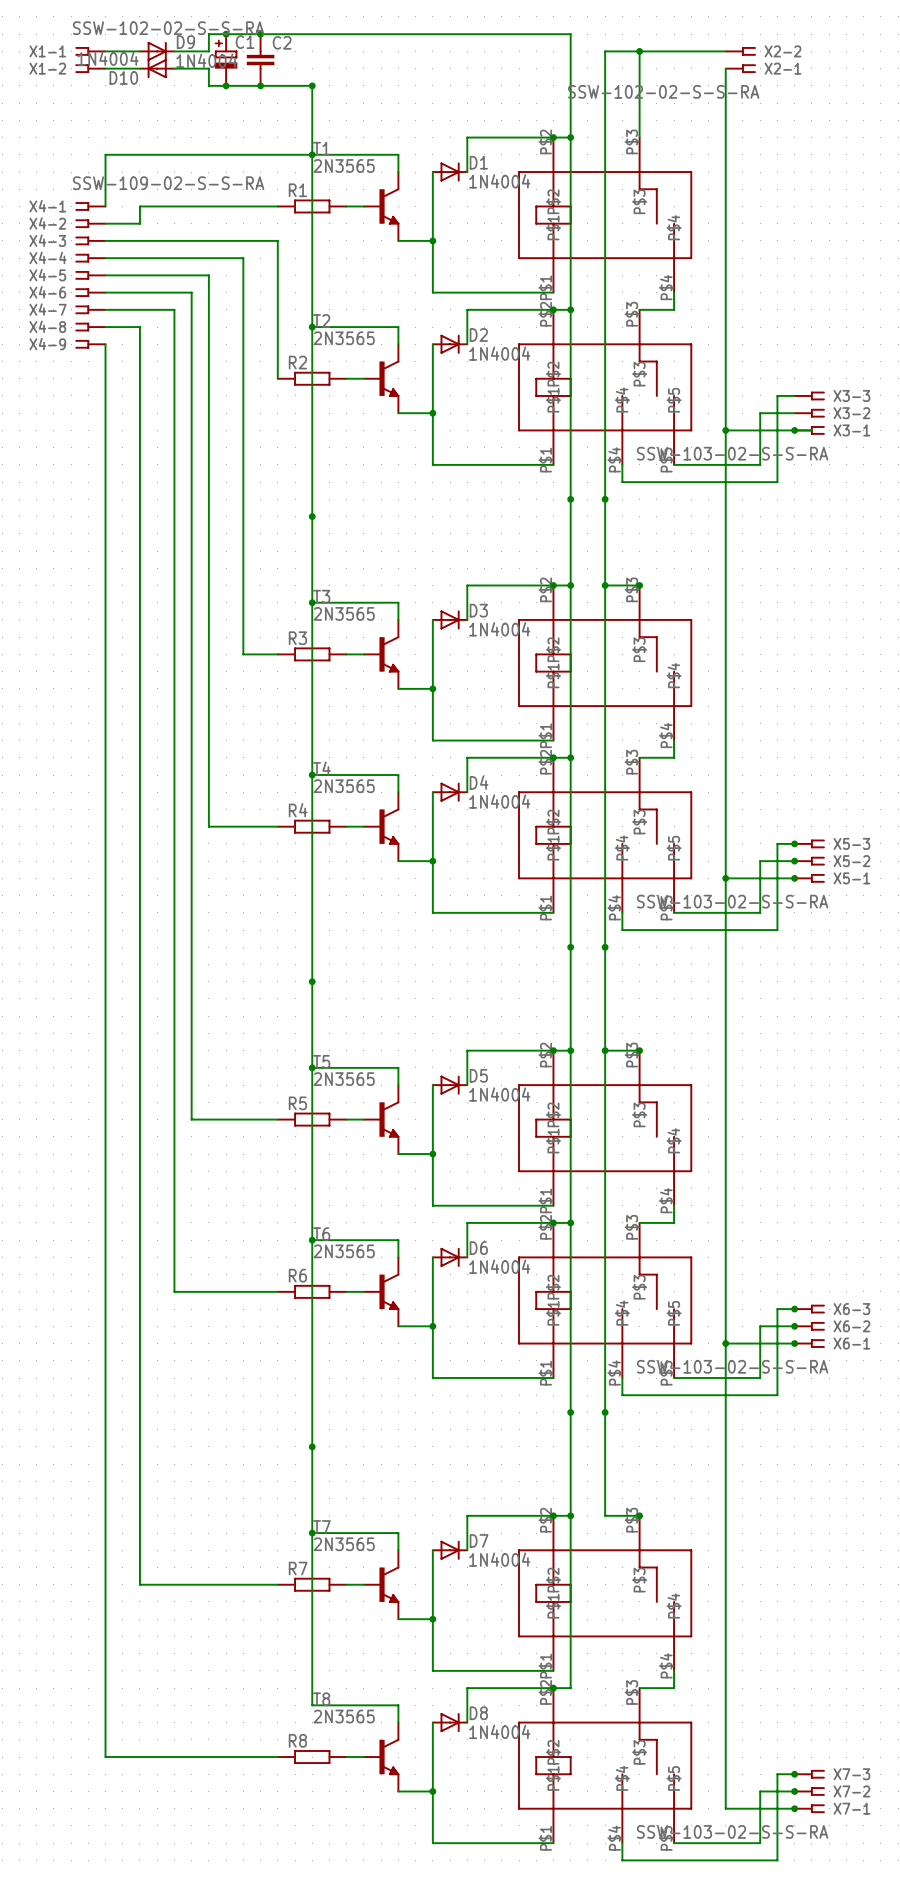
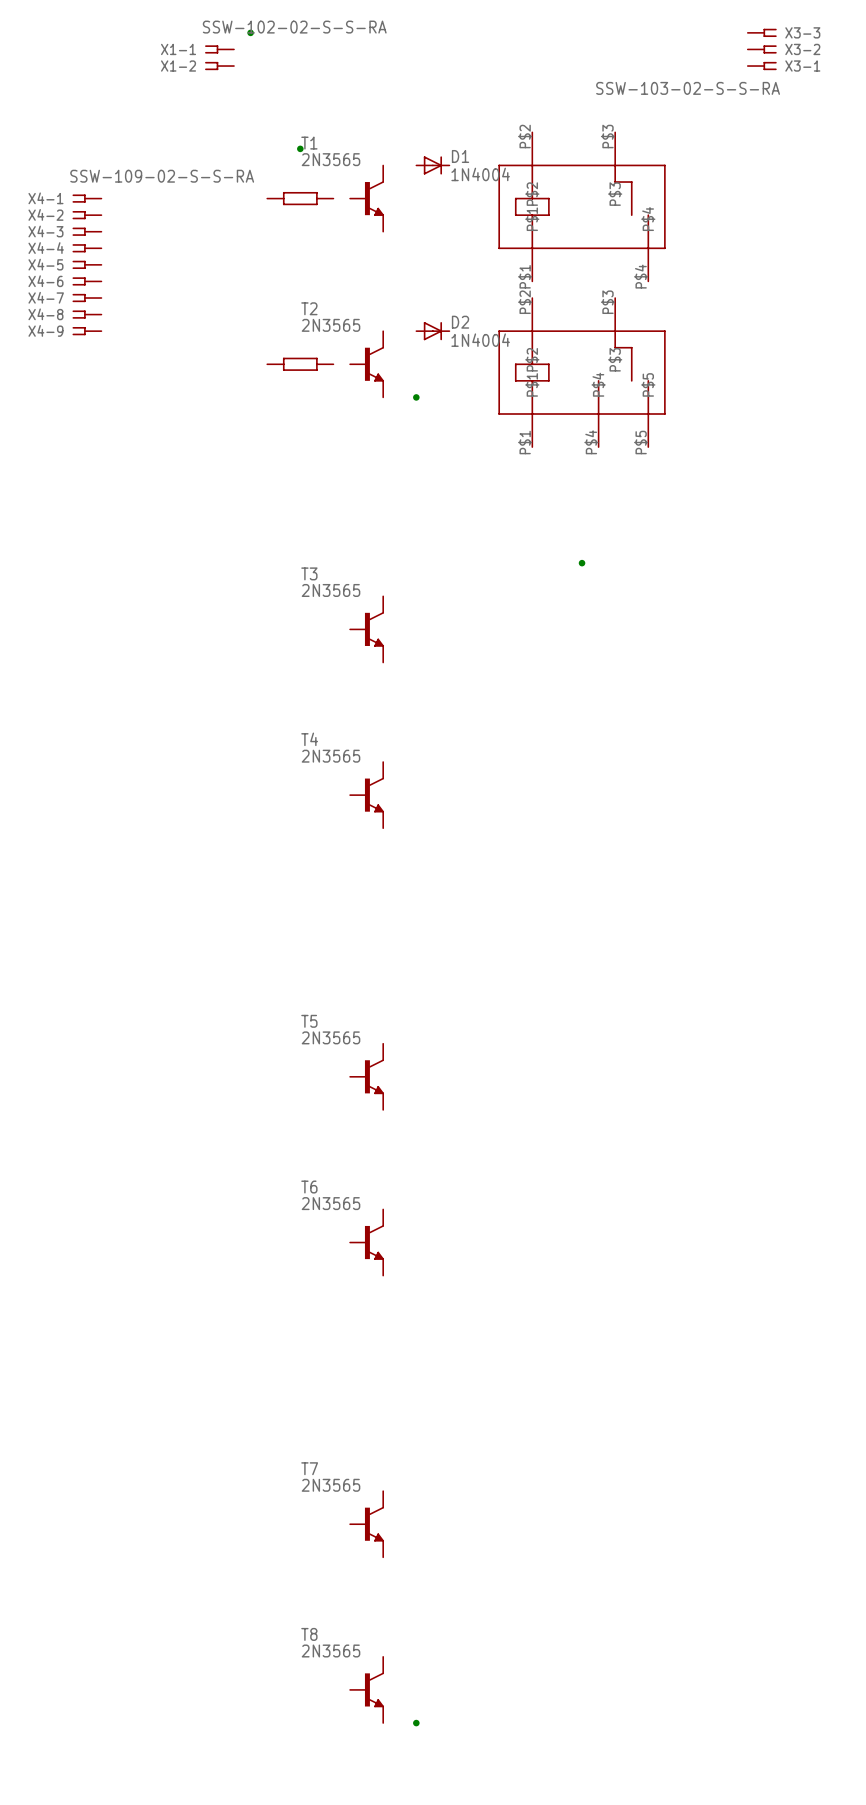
junction: (226, 34) -> none
X1-1 position: (90, 51) -> (219, 49)
wire: (105, 51) (139, 51) -> none
D9: 1N4004 (157, 51) -> none
wire: (174, 51) (208, 51) (208, 34) (570, 34) (570, 1688) (467, 1688) (467, 1722) -> none
wire: (639, 51) (639, 137) -> none
junction: (639, 51) -> none
wire: (725, 51) (605, 51) (605, 1515) (639, 1515) -> none
X2-2: (740, 51) -> none
C1: (226, 60) -> none
C2: (260, 60) -> none
X1-2 position: (90, 68) -> (219, 66)
wire: (105, 68) (139, 68) -> none
D10: 1N4004 (157, 68) -> none
wire: (174, 68) (208, 68) (208, 85) (312, 85) (312, 1705) (398, 1705) (398, 1722) -> none
wire: (725, 68) (725, 1808) (794, 1808) -> none
X2-1: SSW-102-02-S-S-RA (740, 68) -> none
junction: (226, 85) -> none
junction: (260, 85) -> none
junction: (312, 85) -> none
junction: (553, 137) -> none
wire: (570, 137) (467, 137) (467, 172) -> none
junction: (570, 137) -> none
wire: (398, 172) (398, 154) (105, 154) (105, 206) -> none
wire: (432, 172) (432, 292) (553, 292) -> none
wire: (277, 206) (139, 206) (139, 223) (105, 223) -> none
R1: (312, 206) -> none
part: none -> (300, 198)
wire: (346, 206) (363, 206) -> none
wire: (105, 240) (277, 240) (277, 378) -> none
wire: (398, 240) (432, 240) -> none
junction: (432, 240) -> none
wire: (105, 258) (243, 258) (243, 654) (277, 654) -> none
wire: (105, 275) (208, 275) (208, 826) (277, 826) -> none
wire: (105, 292) (191, 292) (191, 1119) (277, 1119) -> none
wire: (674, 292) (674, 309) (639, 309) -> none
wire: (105, 309) (174, 309) (174, 1291) (277, 1291) -> none
junction: (553, 309) -> none
wire: (570, 309) (467, 309) (467, 344) -> none
junction: (570, 309) -> none
wire: (105, 327) (139, 327) (139, 1584) (277, 1584) -> none
wire: (312, 327) (398, 327) (398, 344) -> none
junction: (312, 327) -> none
wire: (105, 344) (105, 1757) (277, 1757) -> none
wire: (432, 344) (432, 464) (553, 464) -> none
R2: (312, 378) -> none
part: none -> (300, 364)
wire: (346, 378) (363, 378) -> none
wire: (794, 395) (777, 395) (777, 482) (622, 482) (622, 464) -> none
X3-3 position: (809, 395) -> (762, 32)
wire: (398, 413) (432, 413) -> none
wire: (794, 413) (760, 413) (760, 464) (674, 464) -> none
X3-2 position: (809, 413) -> (762, 49)
wire: (725, 430) (811, 430) -> none
junction: (725, 430) -> none
junction: (794, 430) -> none
X3-1 position: (809, 430) -> (762, 66)
junction: (570, 499) -> none
junction: (605, 499) -> none
junction: (312, 516) -> none
junction: (553, 585) -> none
wire: (570, 585) (467, 585) (467, 619) -> none
junction: (570, 585) -> none
wire: (605, 585) (639, 585) -> none
junction: (639, 585) -> none
wire: (312, 602) (398, 602) (398, 619) -> none
junction: (312, 602) -> none
wire: (432, 619) (432, 740) (553, 740) -> none
D3: 1N4004 (450, 619) -> none
R3: (312, 654) -> none
wire: (346, 654) (363, 654) -> none
part: (605, 663) -> none
wire: (398, 688) (432, 688) -> none
junction: (432, 688) -> none
wire: (674, 740) (674, 757) (639, 757) -> none
junction: (553, 757) -> none
wire: (570, 757) (467, 757) (467, 792) -> none
junction: (570, 757) -> none
wire: (312, 775) (398, 775) (398, 792) -> none
junction: (312, 775) -> none
wire: (432, 792) (432, 912) (553, 912) -> none
D4: 1N4004 (450, 792) -> none
R4: (312, 826) -> none
wire: (346, 826) (363, 826) -> none
part: (605, 835) -> none
wire: (794, 843) (777, 843) (777, 930) (622, 930) (622, 912) -> none
junction: (794, 843) -> none
X5-3: (809, 843) -> none
wire: (398, 861) (432, 861) -> none
junction: (432, 861) -> none
wire: (794, 861) (760, 861) (760, 912) (674, 912) -> none
junction: (794, 861) -> none
X5-2: (809, 861) -> none
wire: (725, 878) (794, 878) -> none
junction: (725, 878) -> none
junction: (794, 878) -> none
X5-1: SSW-103-02-S-S-RA (809, 878) -> none
junction: (570, 947) -> none
junction: (605, 947) -> none
junction: (312, 981) -> none
junction: (553, 1050) -> none
wire: (570, 1050) (467, 1050) (467, 1085) -> none
junction: (570, 1050) -> none
wire: (605, 1050) (639, 1050) -> none
junction: (605, 1050) -> none
junction: (639, 1050) -> none
wire: (312, 1067) (398, 1067) (398, 1085) -> none
junction: (312, 1067) -> none
wire: (432, 1085) (432, 1205) (553, 1205) -> none
D5: 1N4004 (450, 1085) -> none
R5: (312, 1119) -> none
wire: (346, 1119) (363, 1119) -> none
part: (605, 1128) -> none
wire: (398, 1154) (432, 1154) -> none
junction: (432, 1154) -> none
wire: (674, 1205) (674, 1222) (639, 1222) -> none
junction: (553, 1222) -> none
wire: (570, 1222) (467, 1222) (467, 1257) -> none
junction: (570, 1222) -> none
wire: (312, 1240) (398, 1240) (398, 1257) -> none
junction: (312, 1240) -> none
wire: (432, 1257) (432, 1378) (553, 1378) -> none
D6: 1N4004 (450, 1257) -> none
R6: (312, 1291) -> none
wire: (346, 1291) (363, 1291) -> none
part: (605, 1300) -> none
wire: (794, 1309) (777, 1309) (777, 1395) (622, 1395) (622, 1378) -> none
junction: (794, 1309) -> none
X6-3: (809, 1309) -> none
wire: (398, 1326) (432, 1326) -> none
junction: (432, 1326) -> none
wire: (794, 1326) (760, 1326) (760, 1378) (674, 1378) -> none
junction: (794, 1326) -> none
X6-2: (809, 1326) -> none
wire: (725, 1343) (794, 1343) -> none
junction: (725, 1343) -> none
junction: (794, 1343) -> none
X6-1: SSW-103-02-S-S-RA (809, 1343) -> none
junction: (570, 1412) -> none
junction: (605, 1412) -> none
junction: (312, 1446) -> none
junction: (553, 1515) -> none
wire: (570, 1515) (467, 1515) (467, 1550) -> none
junction: (570, 1515) -> none
junction: (639, 1515) -> none
wire: (312, 1533) (398, 1533) (398, 1550) -> none
junction: (312, 1533) -> none
wire: (432, 1550) (432, 1670) (553, 1670) -> none
D7: 1N4004 (450, 1550) -> none
R7: (312, 1584) -> none
wire: (346, 1584) (363, 1584) -> none
part: (605, 1593) -> none
wire: (398, 1619) (432, 1619) -> none
junction: (432, 1619) -> none
wire: (674, 1670) (674, 1688) (639, 1688) -> none
junction: (553, 1688) -> none
wire: (432, 1722) (432, 1843) (553, 1843) -> none
D8: 1N4004 (450, 1722) -> none
R8: (312, 1757) -> none
wire: (346, 1757) (363, 1757) -> none
part: (605, 1765) -> none
wire: (794, 1774) (777, 1774) (777, 1860) (622, 1860) (622, 1843) -> none
junction: (794, 1774) -> none
X7-3: (809, 1774) -> none
wire: (398, 1791) (432, 1791) -> none
wire: (794, 1791) (760, 1791) (760, 1843) (674, 1843) -> none
junction: (794, 1791) -> none
X7-2: (809, 1791) -> none
junction: (794, 1808) -> none
X7-1: SSW-103-02-S-S-RA (809, 1808) -> none

